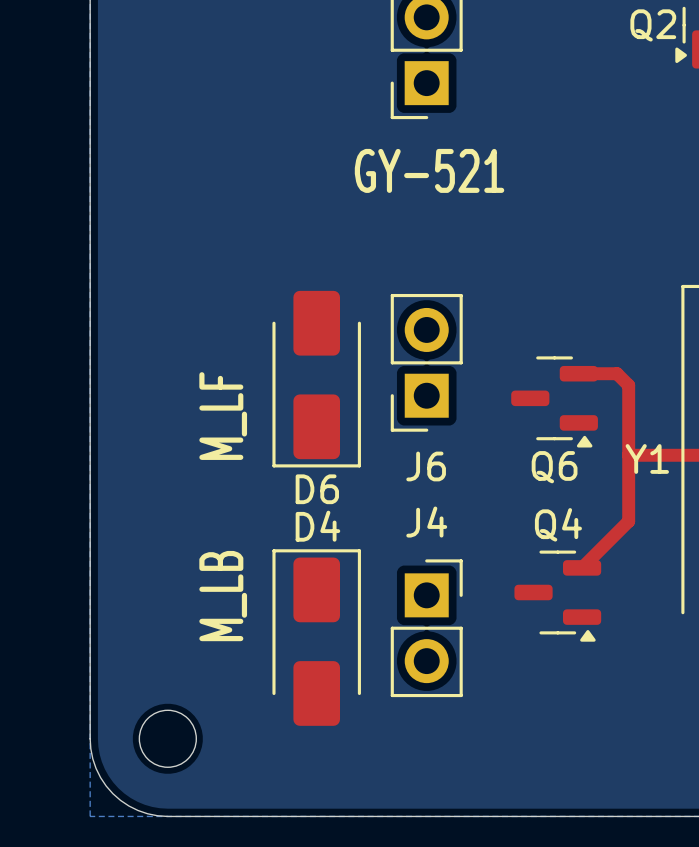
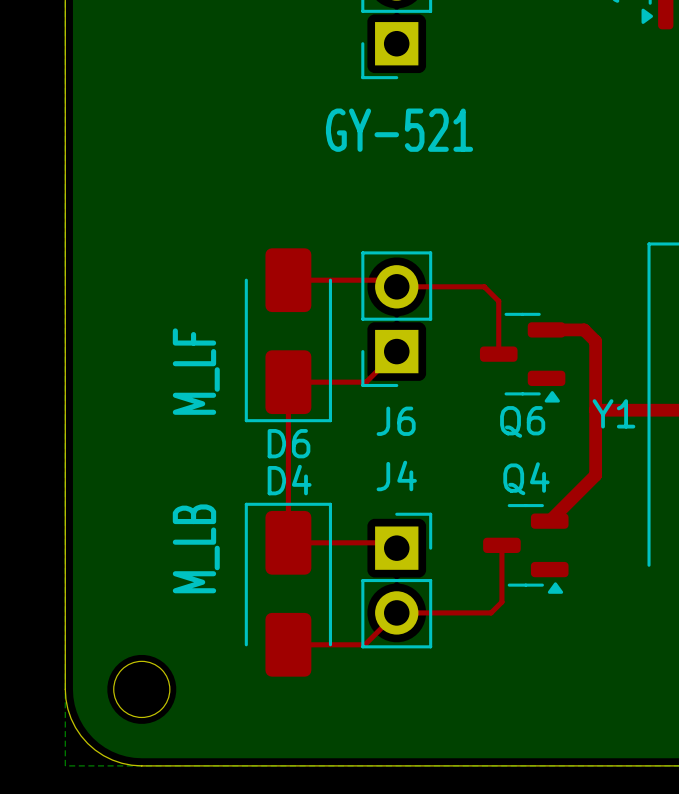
top track: none -> (288, 280) (390, 280) (396, 286) (484, 286) (498, 301) (498, 354)
top track: none -> (396, 351) (366, 382) (288, 382) (288, 542) (391, 542) (396, 548)
top track: none -> (501, 545) (501, 602) (491, 612) (396, 612) (364, 644) (288, 644)

